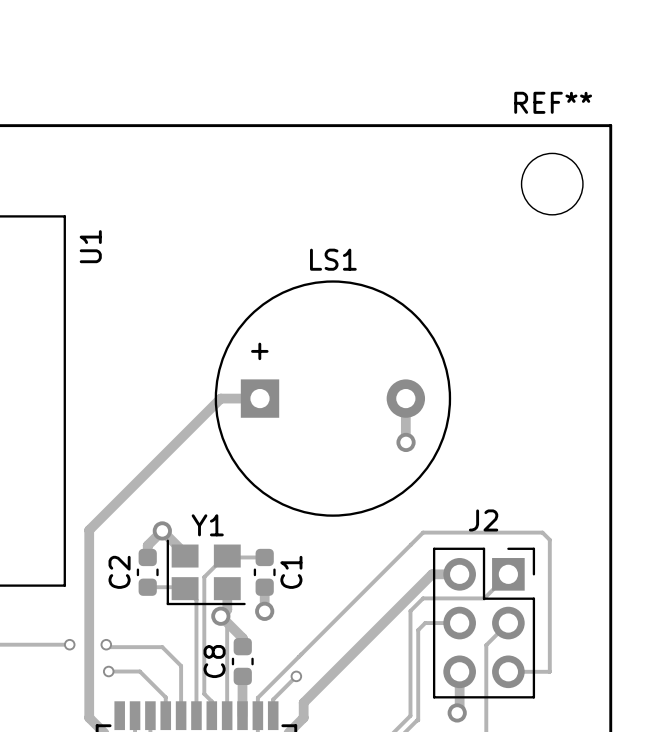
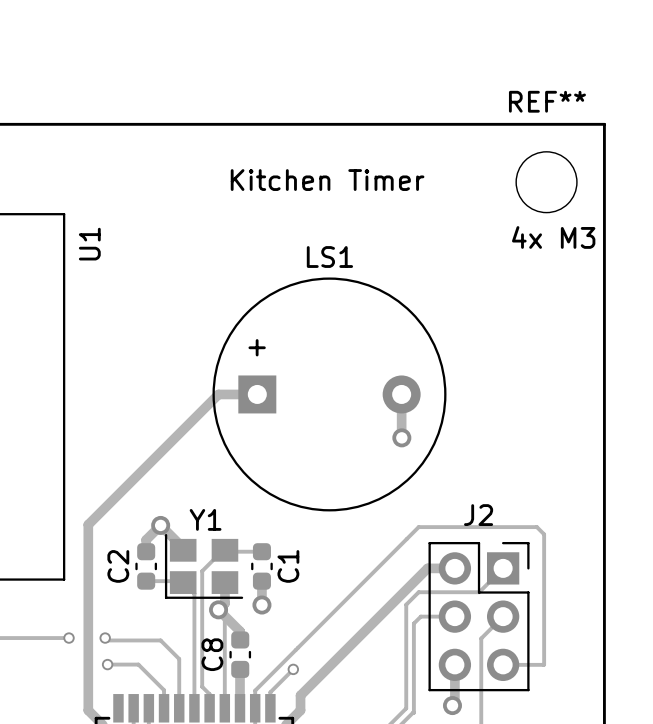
text: none -> Kitchen Timer (327, 180)
text: none -> 4x M3 (553, 237)

